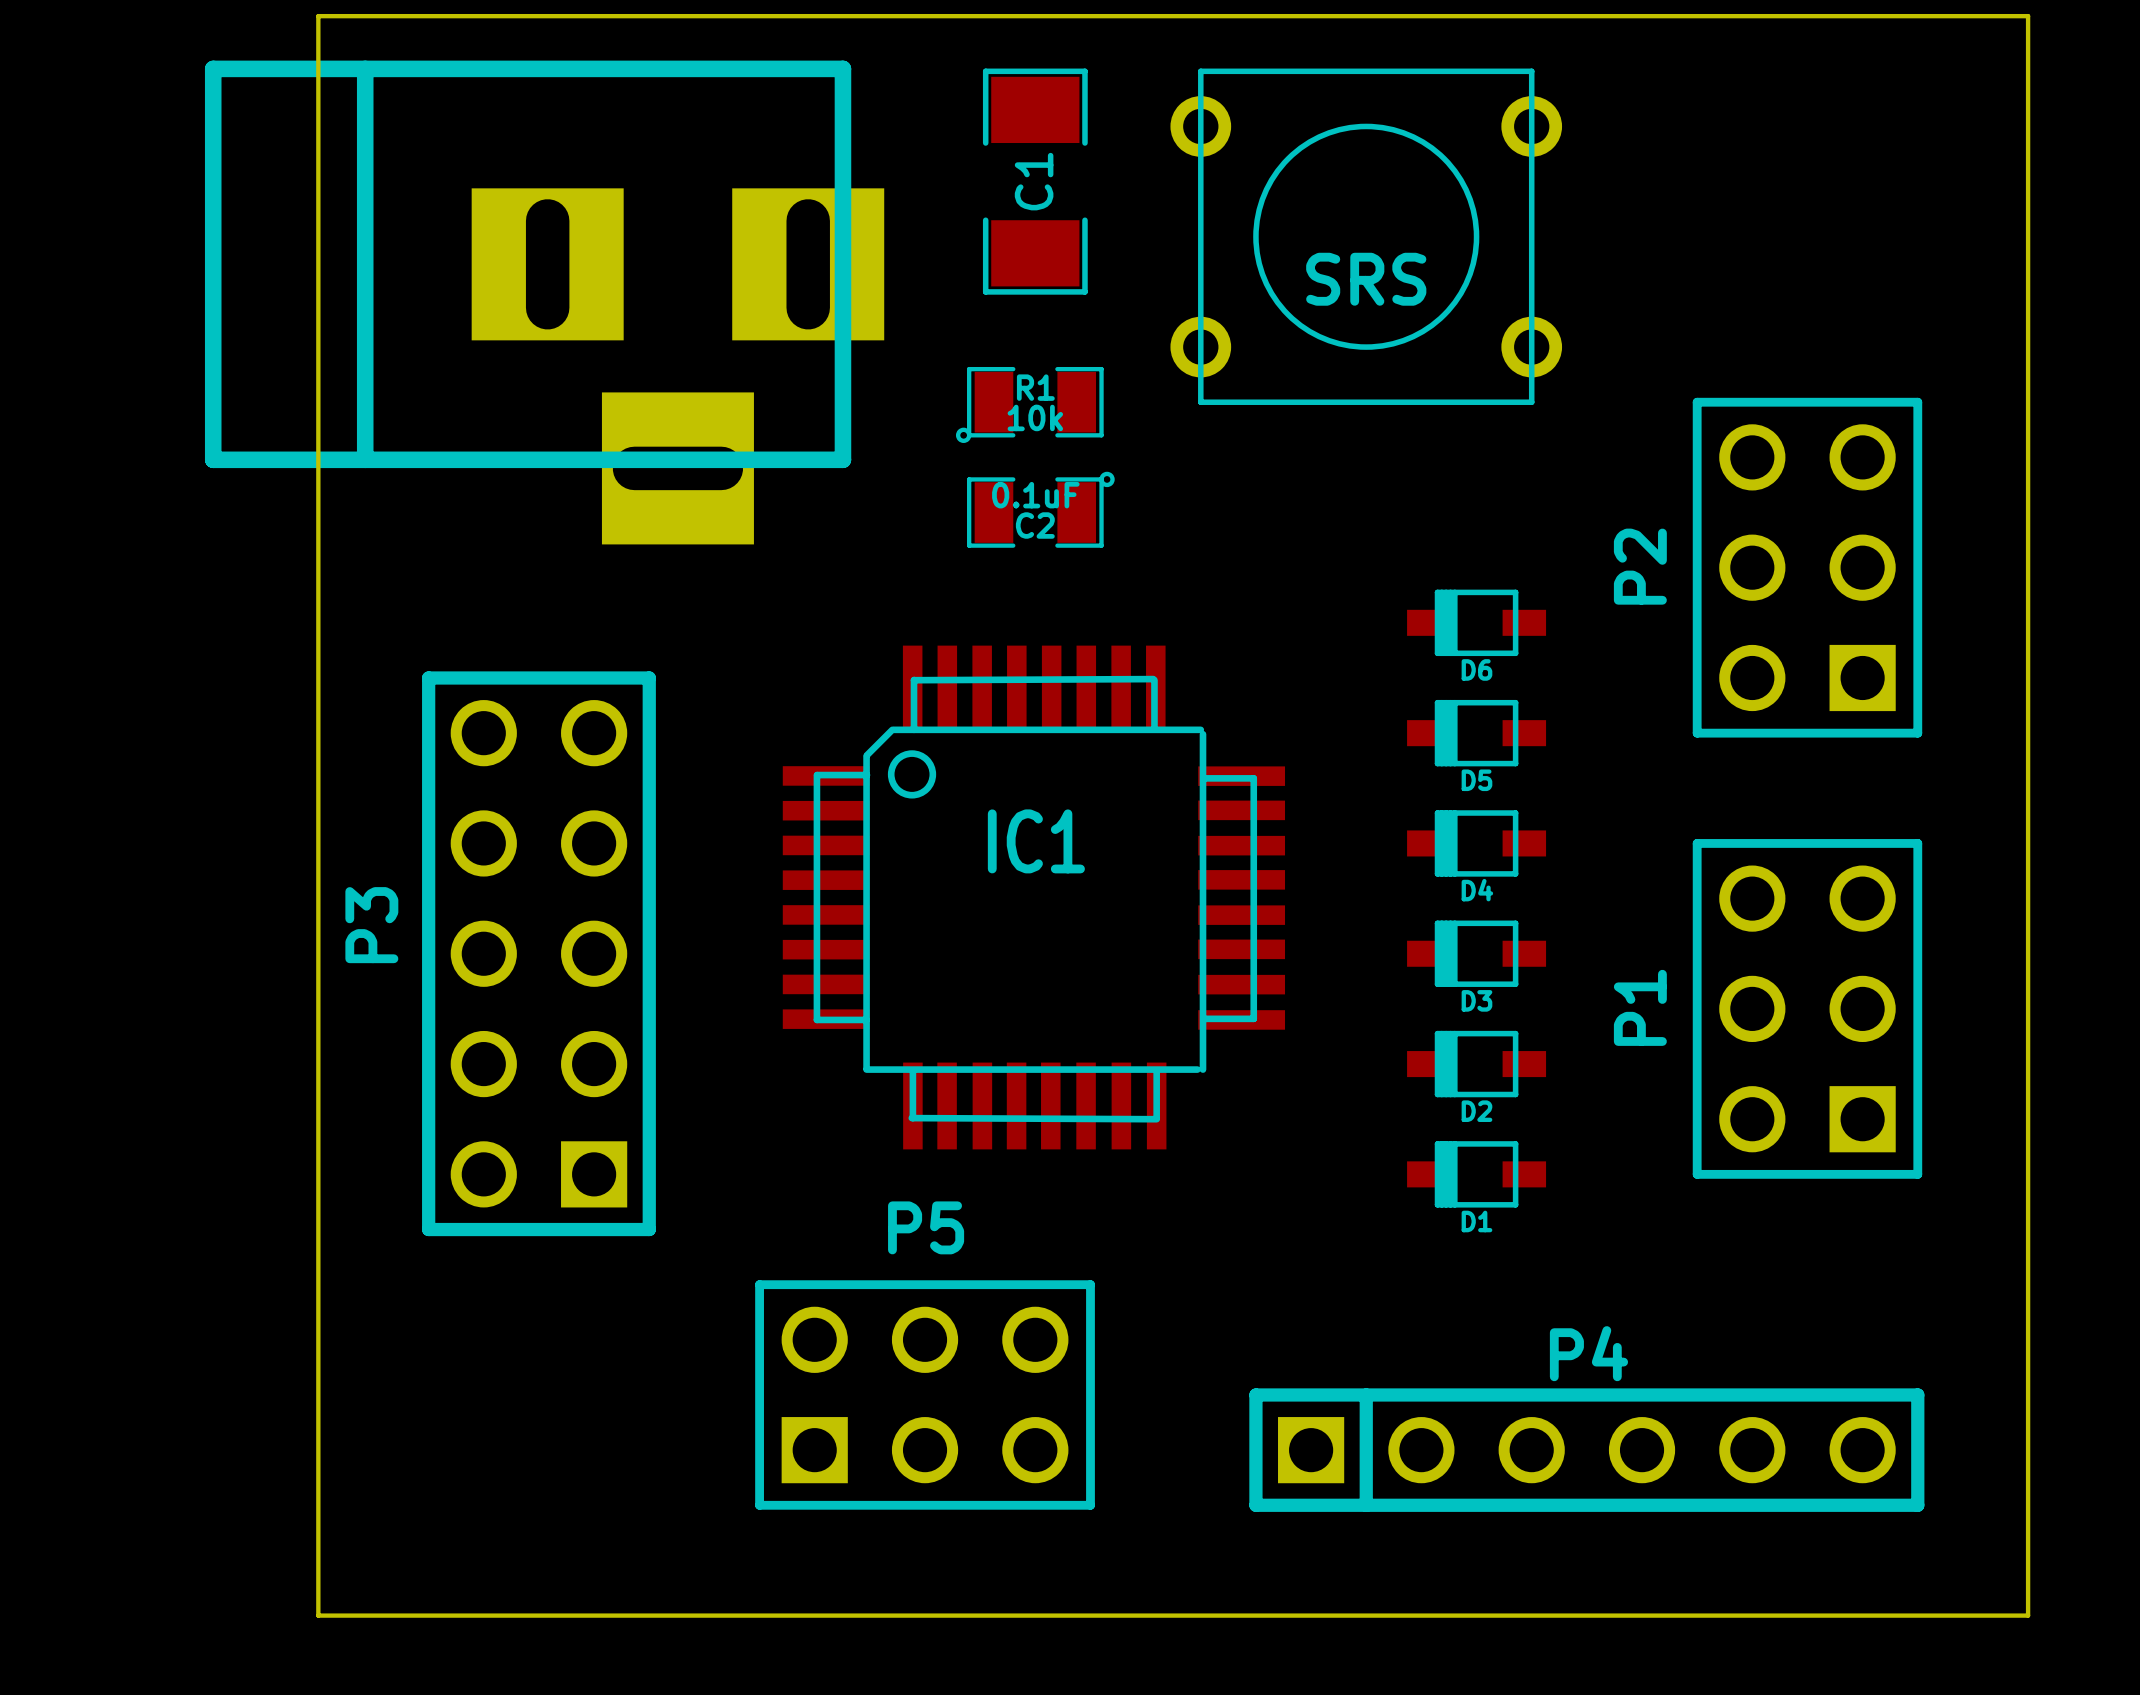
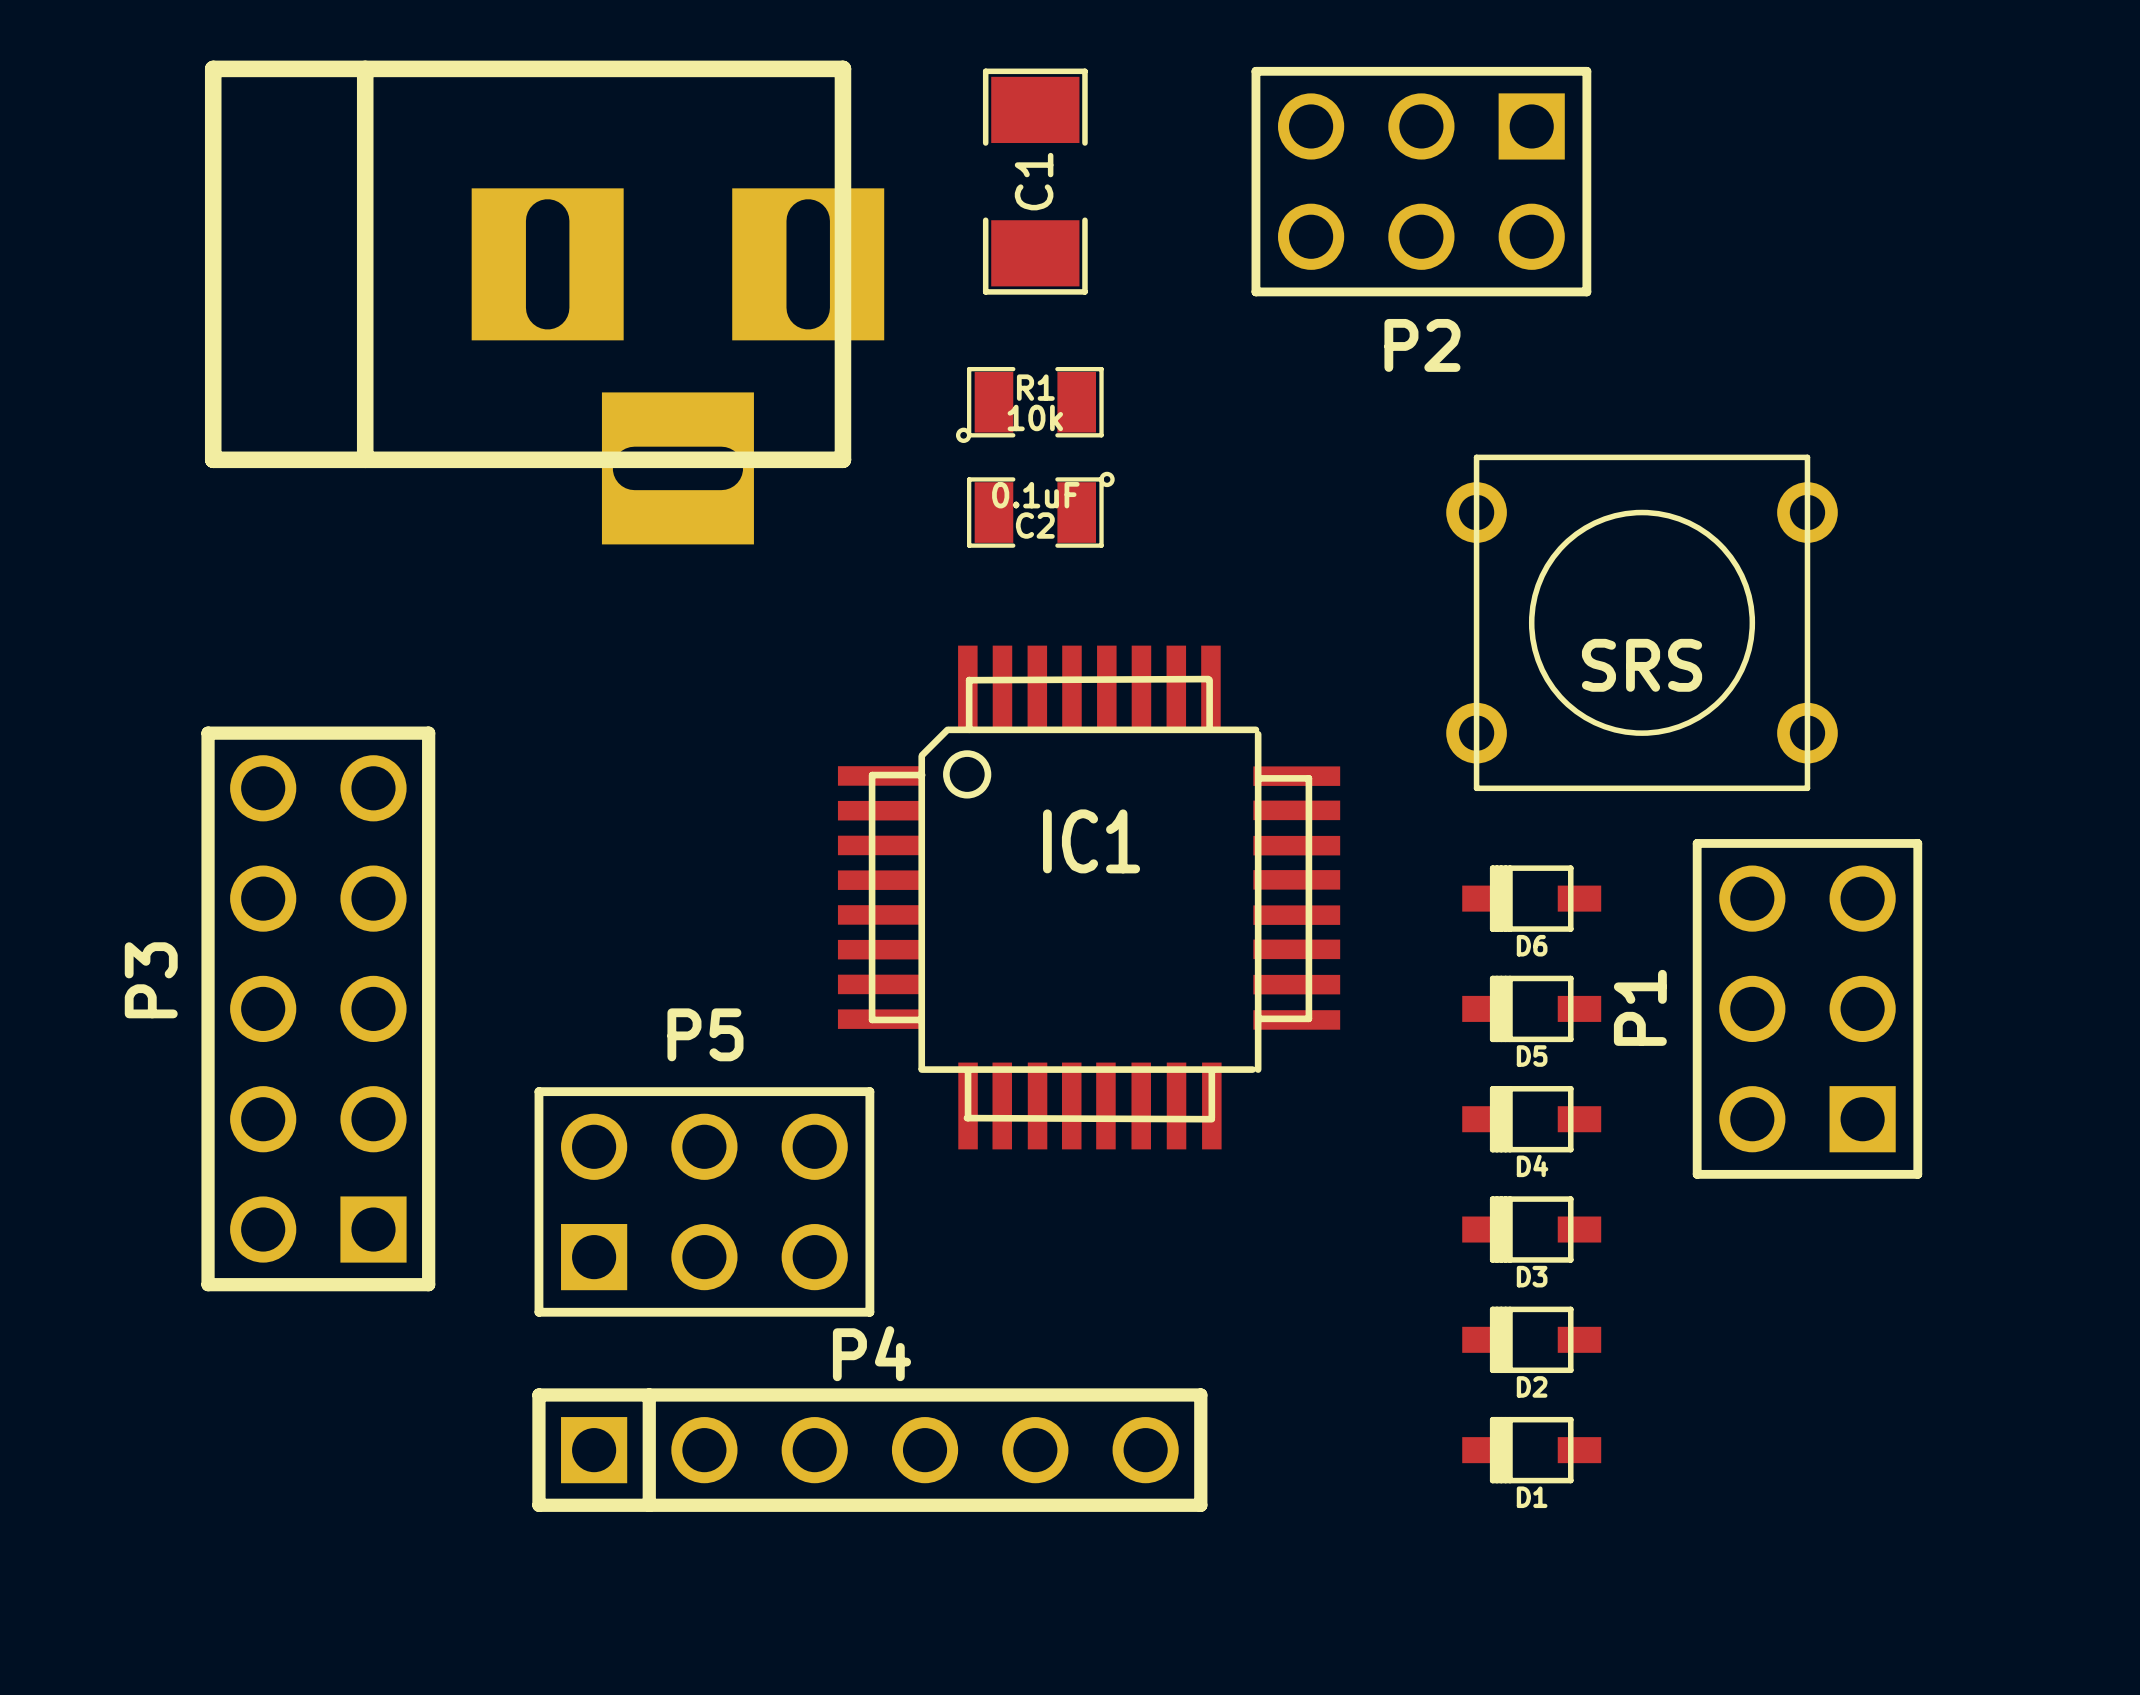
board edge: (318, 16) (318, 1615) (2028, 1615) (2028, 16) (318, 16) -> none
part position: (1366, 236) -> (1642, 622)
P2 rotation: 0° (1807, 567) -> 90° counterclockwise (1421, 181)
P2 position: (1807, 567) -> (1421, 181)
D6 position: (1476, 622) -> (1531, 898)
D5 position: (1476, 733) -> (1531, 1008)
D4 position: (1476, 843) -> (1531, 1119)
IC1 position: (1033, 897) -> (1089, 897)
P3 position: (538, 953) -> (318, 1008)
D3 position: (1476, 953) -> (1531, 1229)
D2 position: (1476, 1064) -> (1531, 1339)
D1 position: (1476, 1174) -> (1531, 1450)
P5 position: (925, 1394) -> (704, 1201)
P4 position: (1586, 1450) -> (869, 1450)

